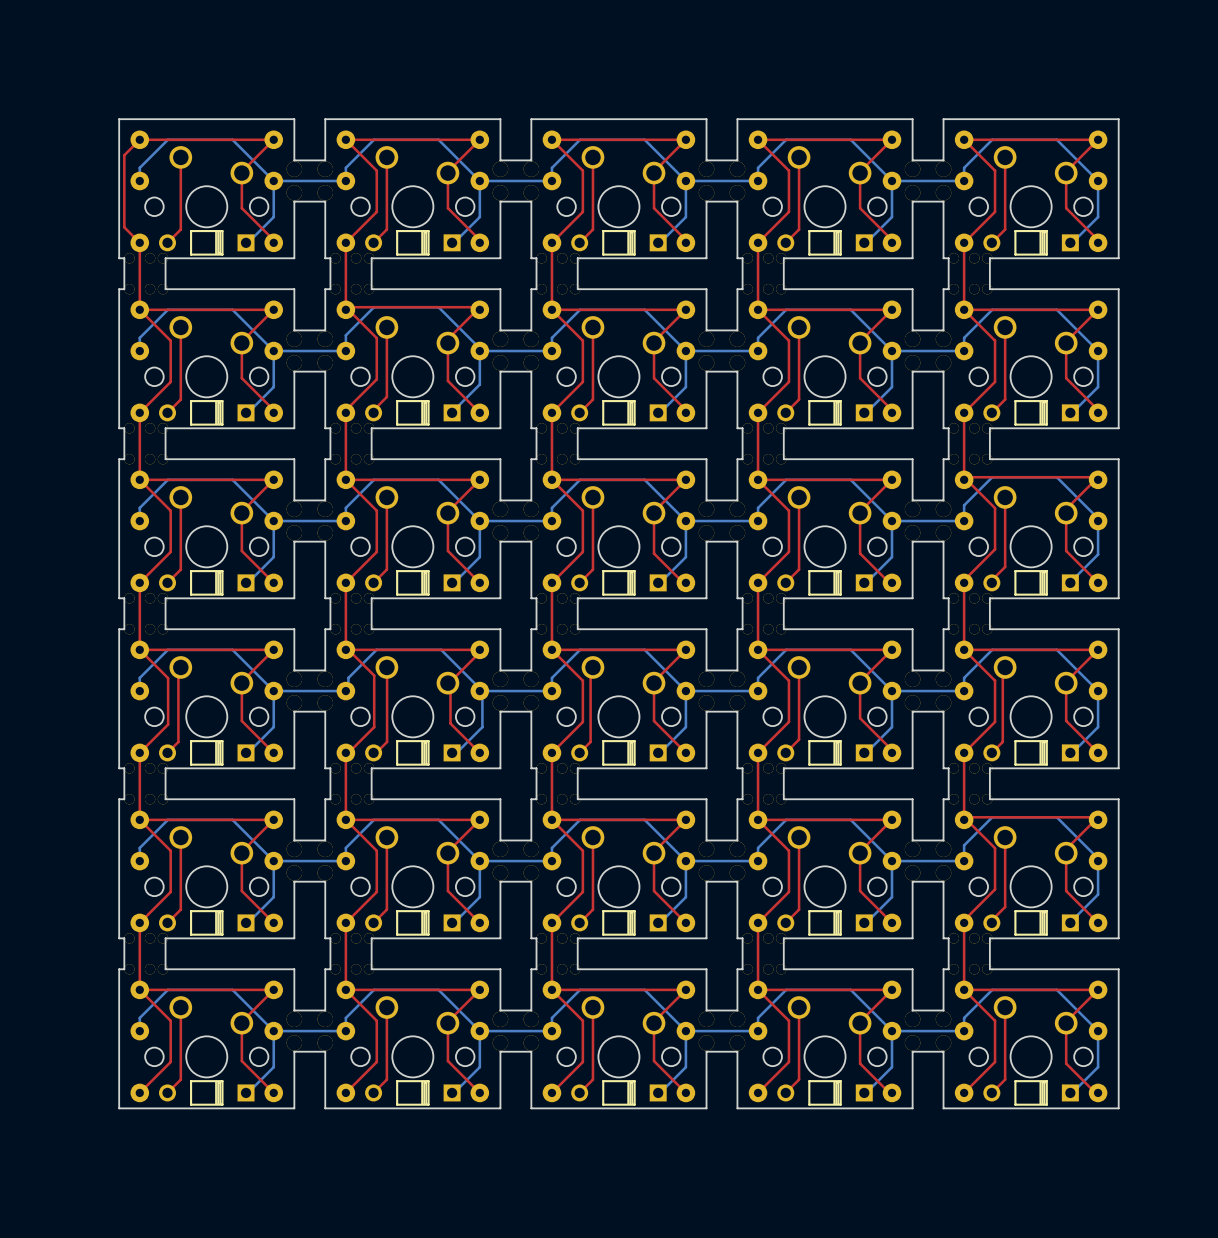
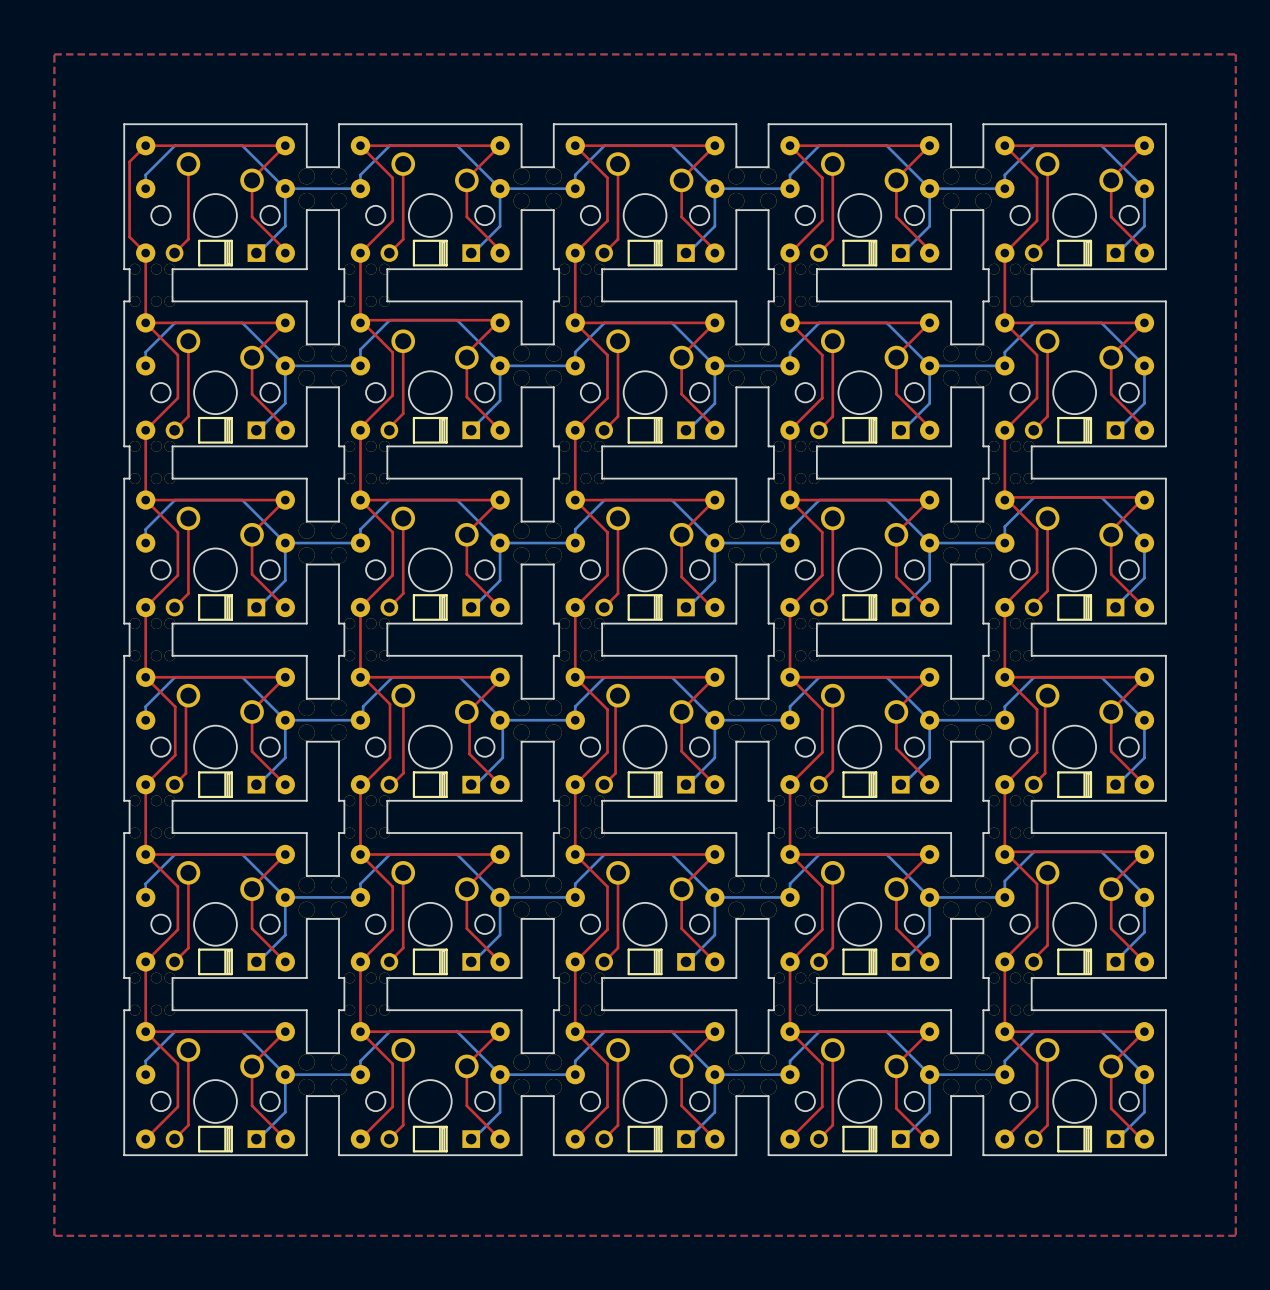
top zone outline: none -> (54, 54) (54, 1235) (1235, 1235) (1235, 54) (54, 54)

